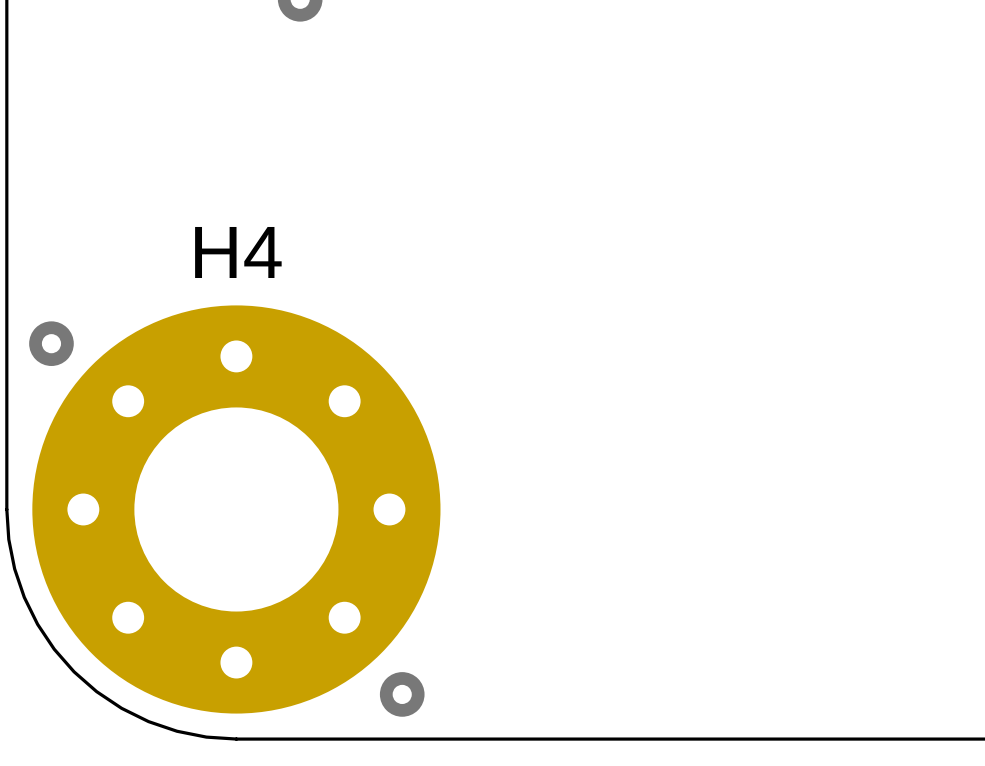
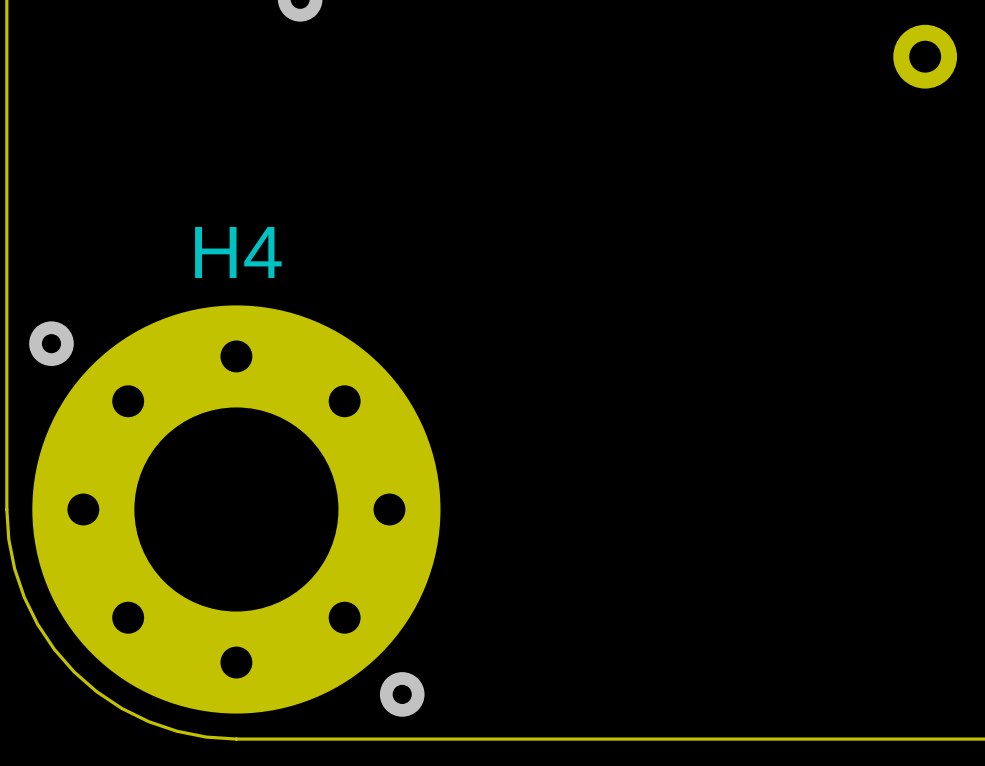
part: none -> (925, 56)

